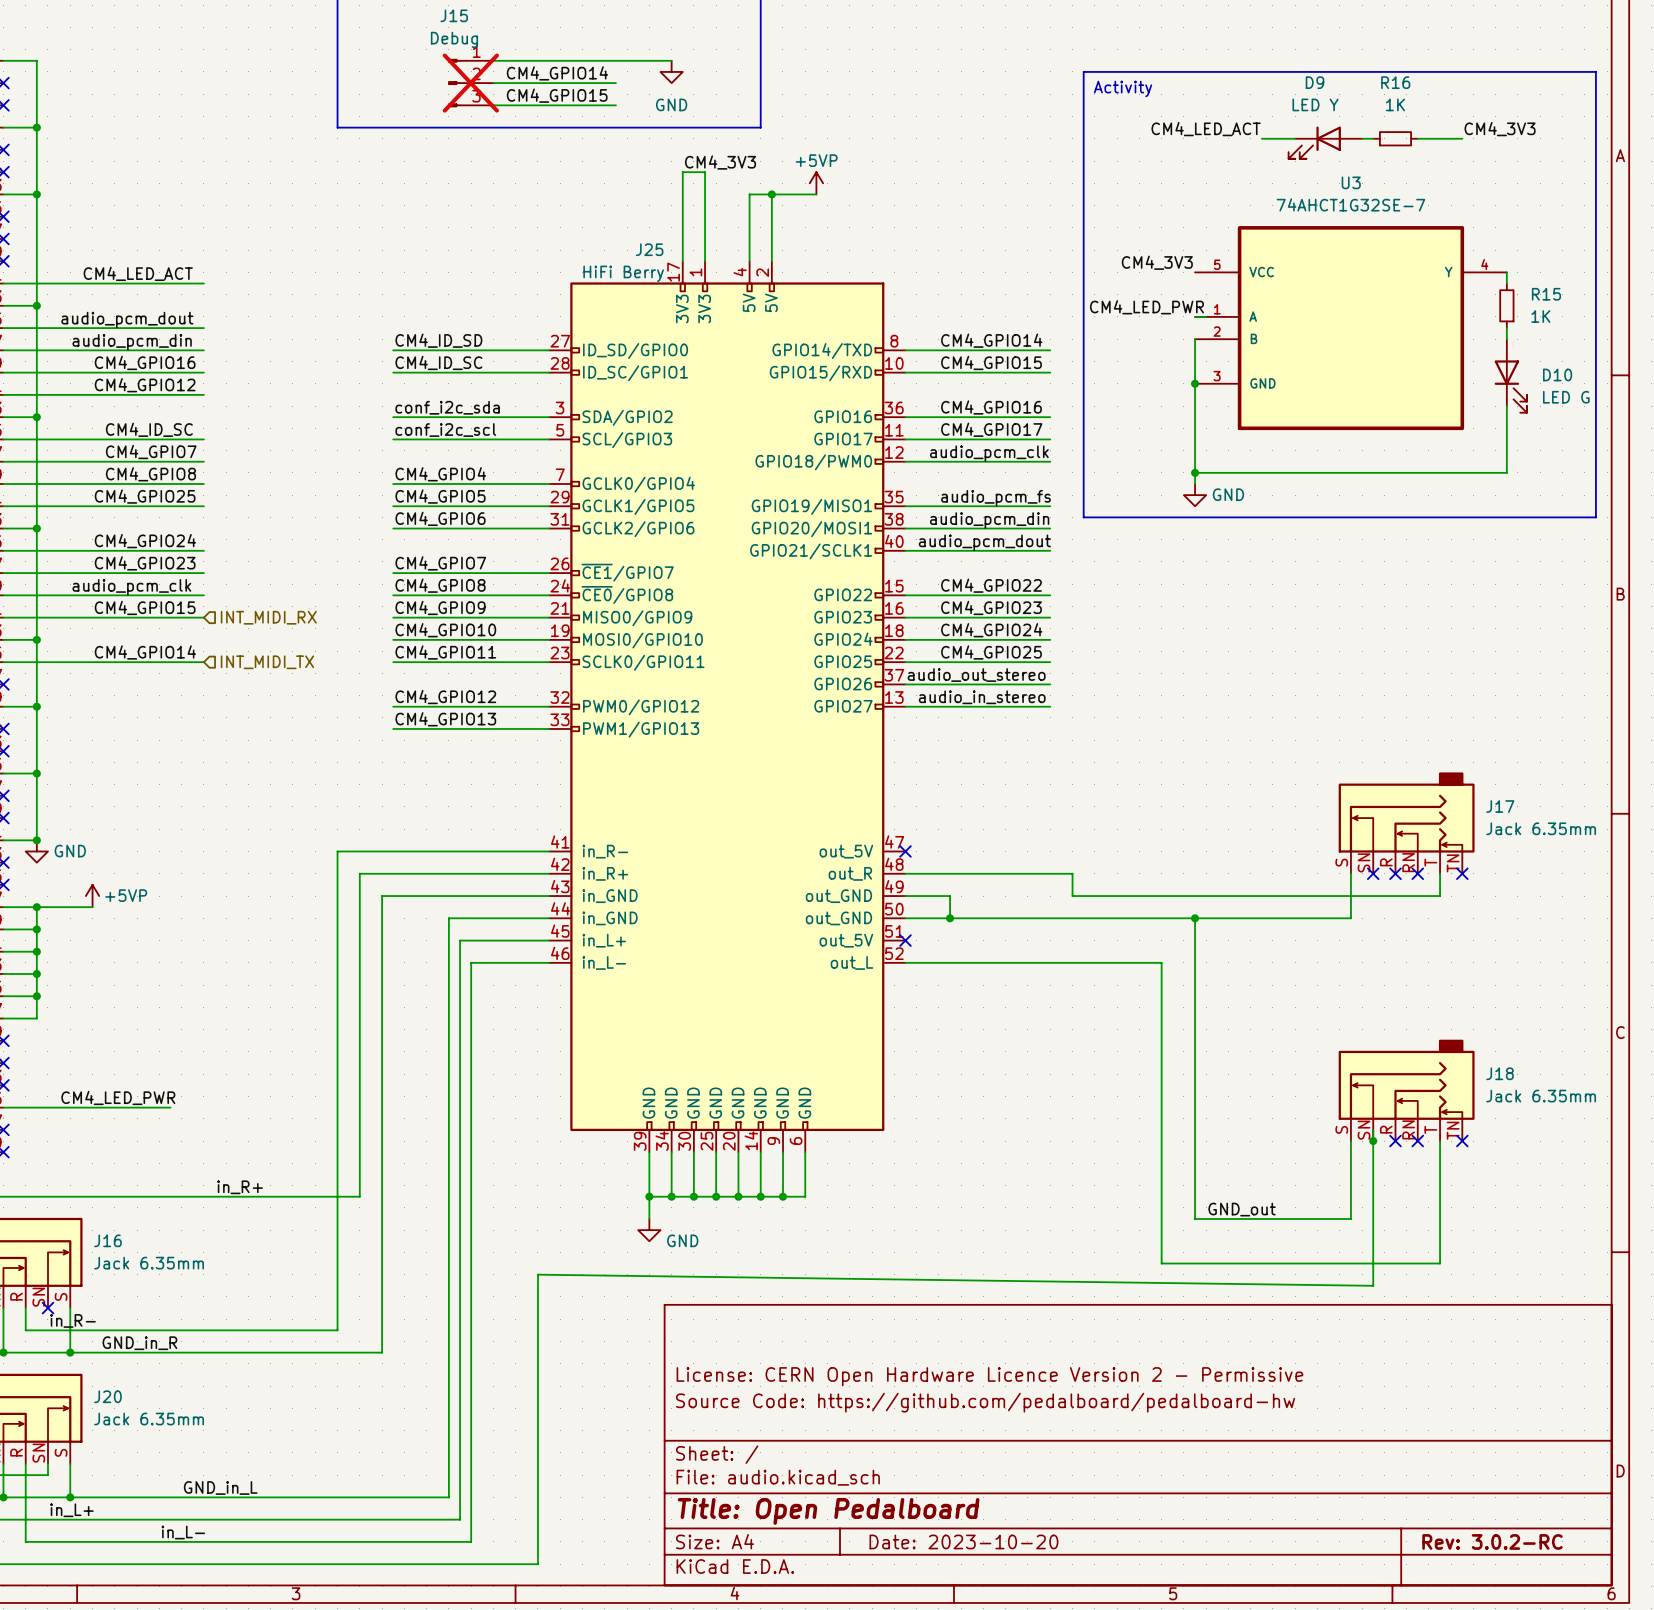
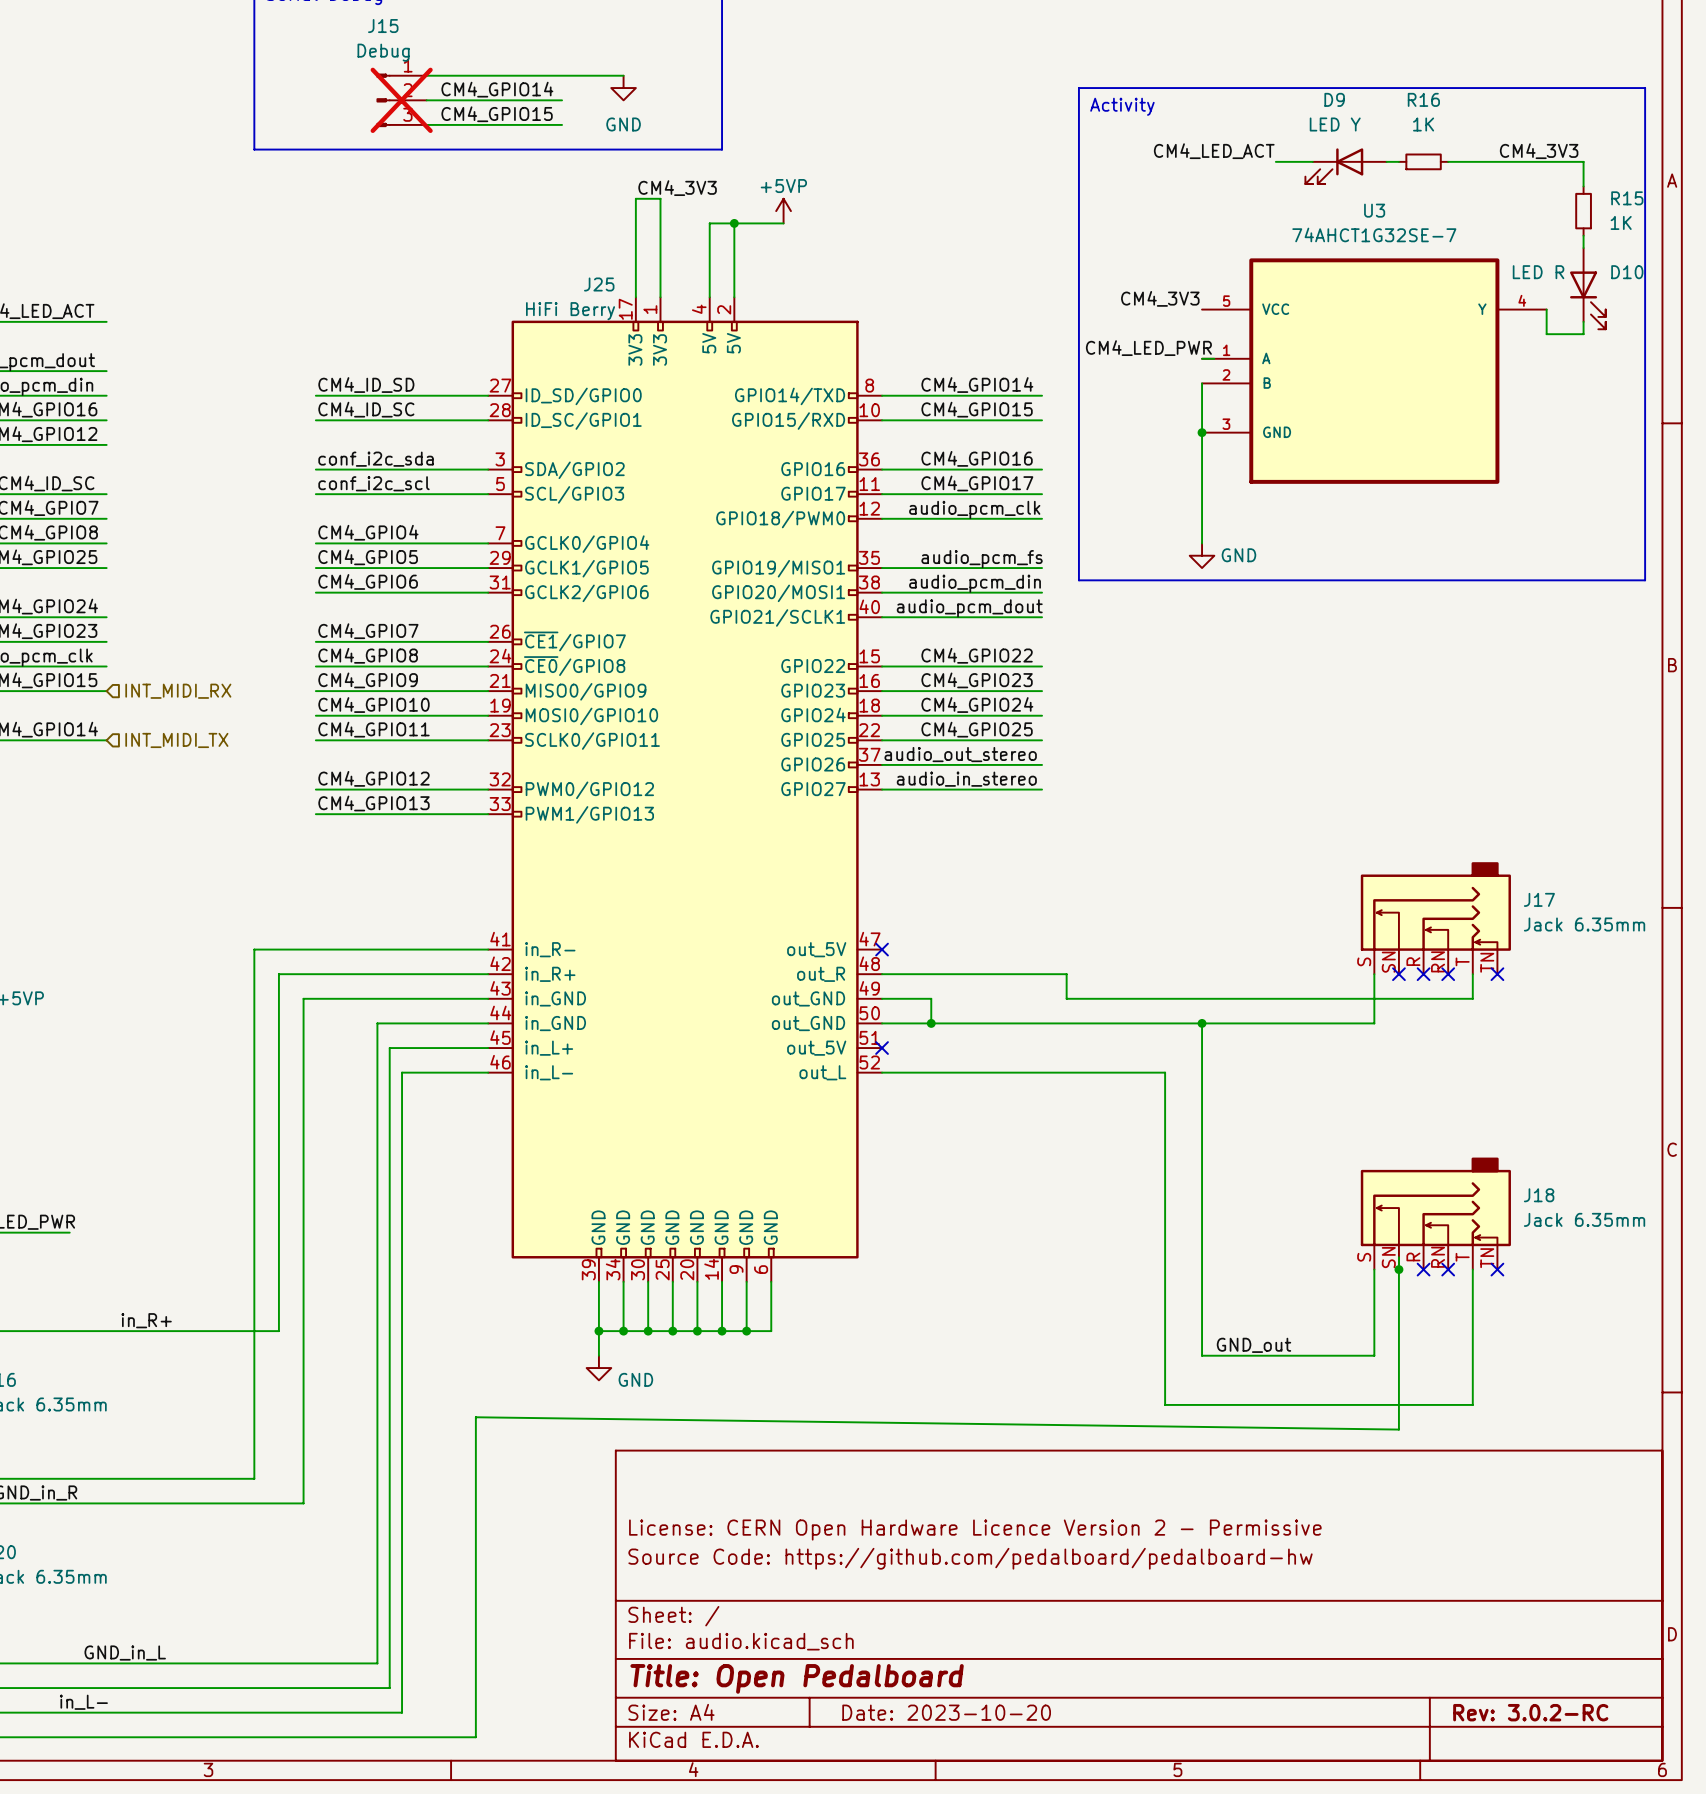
wire: none -> (1497, 161) (1583, 161) (1583, 186)
wire: none -> (1546, 321) (1546, 334) (1583, 334) (1583, 321)
R15 position: (1506, 305) -> (1583, 211)
wire: (1506, 328) (1506, 339) -> (1583, 235) (1583, 248)
D10 name position: D10 (1557, 374) -> D10 (1627, 272)
D10 position: (1510, 375) -> (1587, 288)
D10 value: LED G (1566, 397) -> LED R (1538, 272)
wire: (1506, 406) (1506, 472) (1195, 472) -> none
junction: (1195, 472) -> none

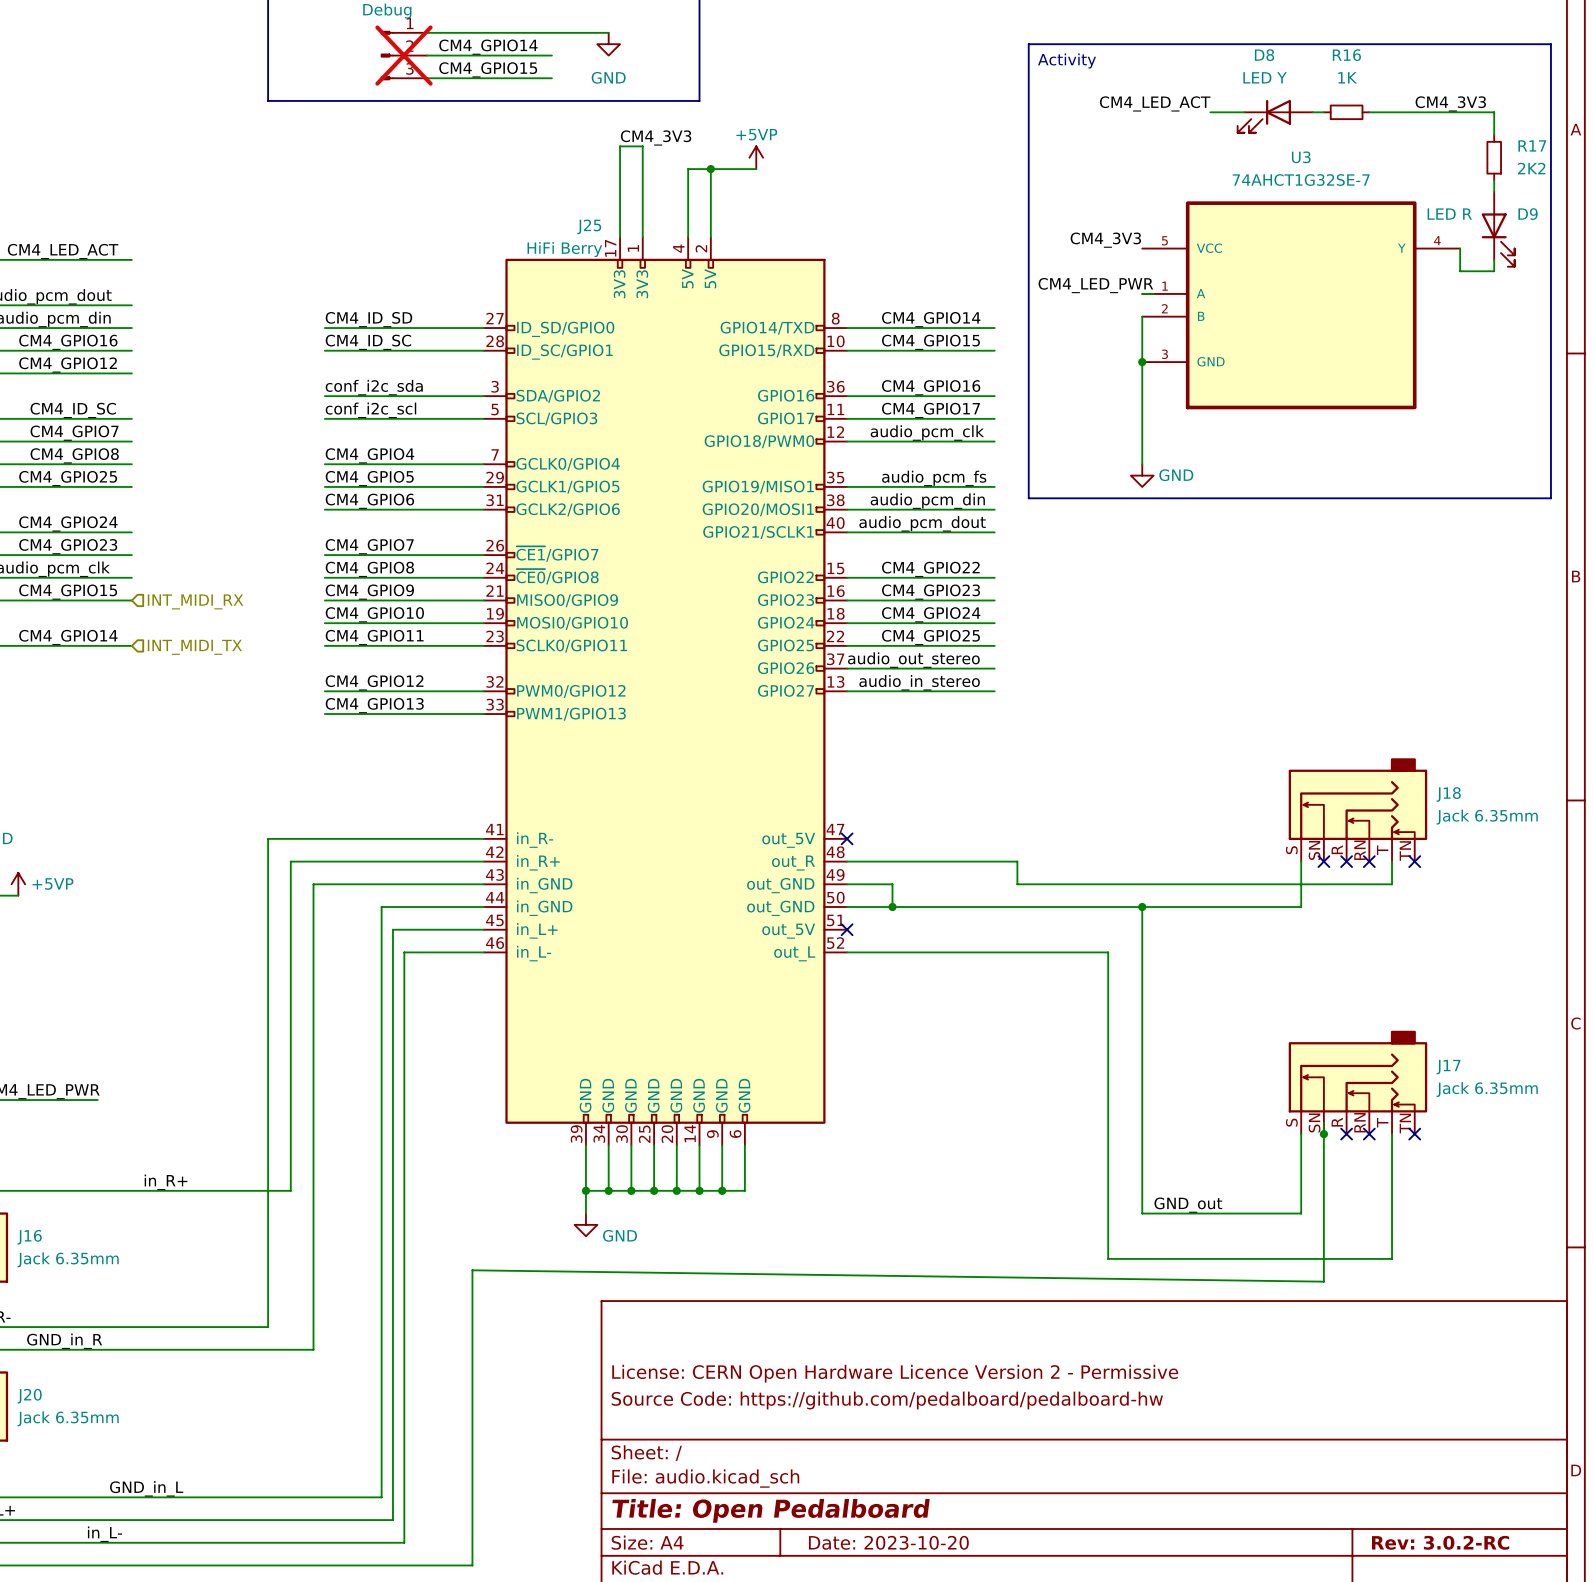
D9 name: D9 (1334, 99) -> D8 (1264, 55)
R15 name: R15 (1627, 198) -> R17 (1532, 145)
R15 value: 1K (1621, 222) -> 2K2 (1531, 168)
D10 name: D10 (1627, 272) -> D9 (1528, 214)
J17 name: J17 (1539, 899) -> J18 (1448, 794)
J18 name: J18 (1539, 1195) -> J17 (1448, 1067)

